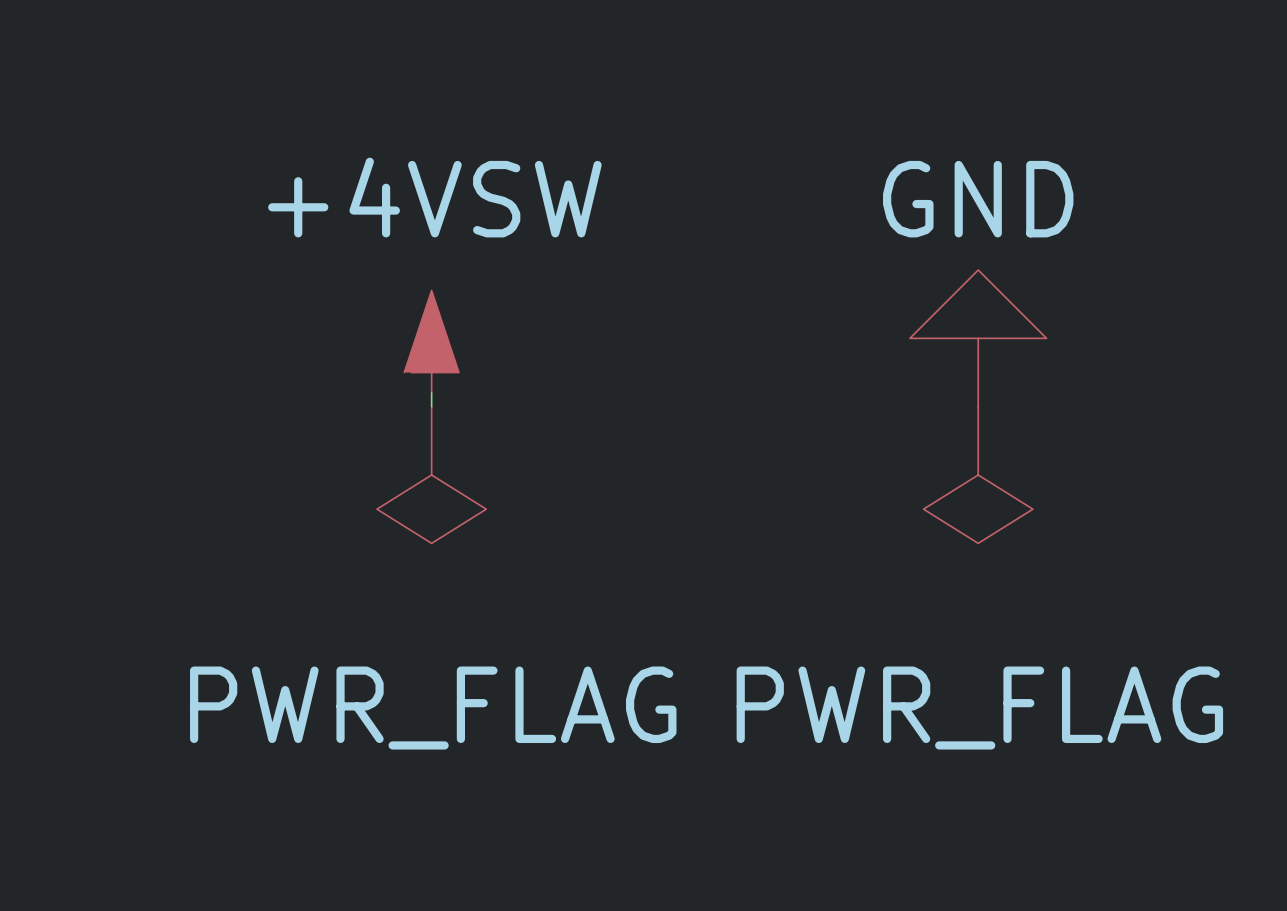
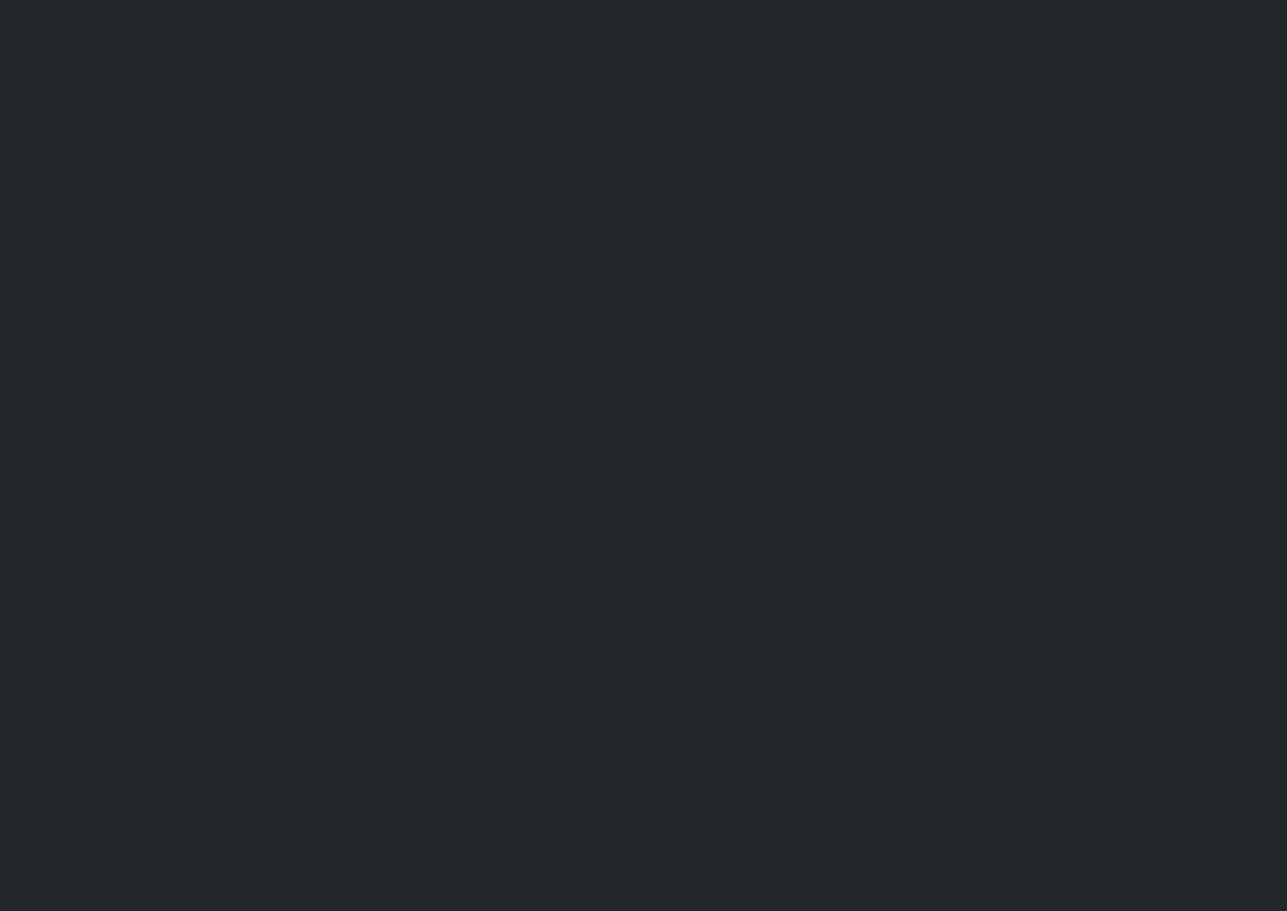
power symbol: GND (978, 338) -> none
power symbol: +4VSW (431, 341) -> none
wire: (431, 393) (431, 406) -> none
power symbol: PWR_FLAG (431, 475) -> none
power symbol: PWR_FLAG (978, 475) -> none

